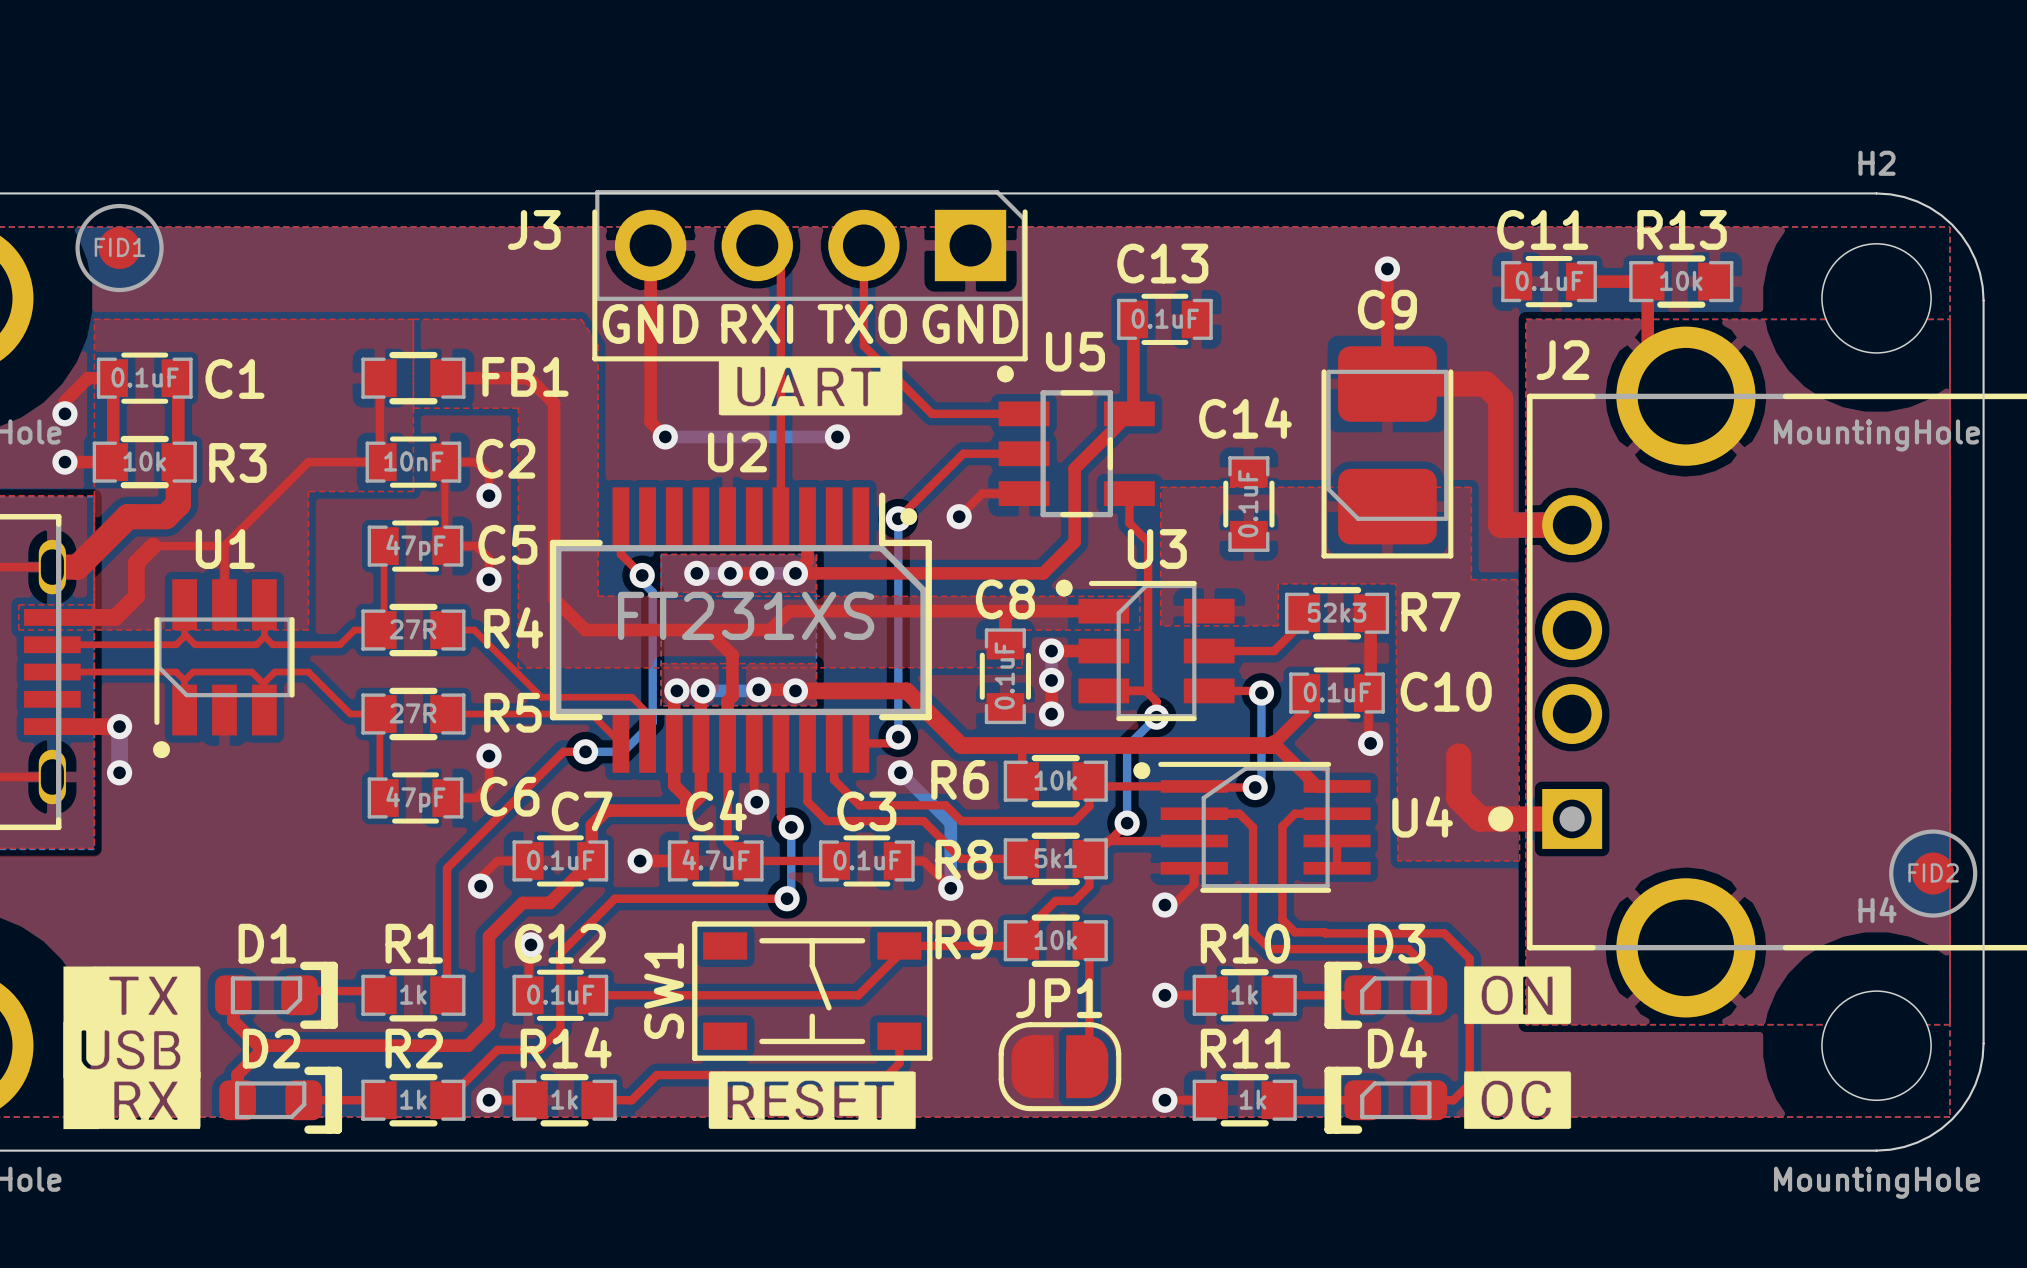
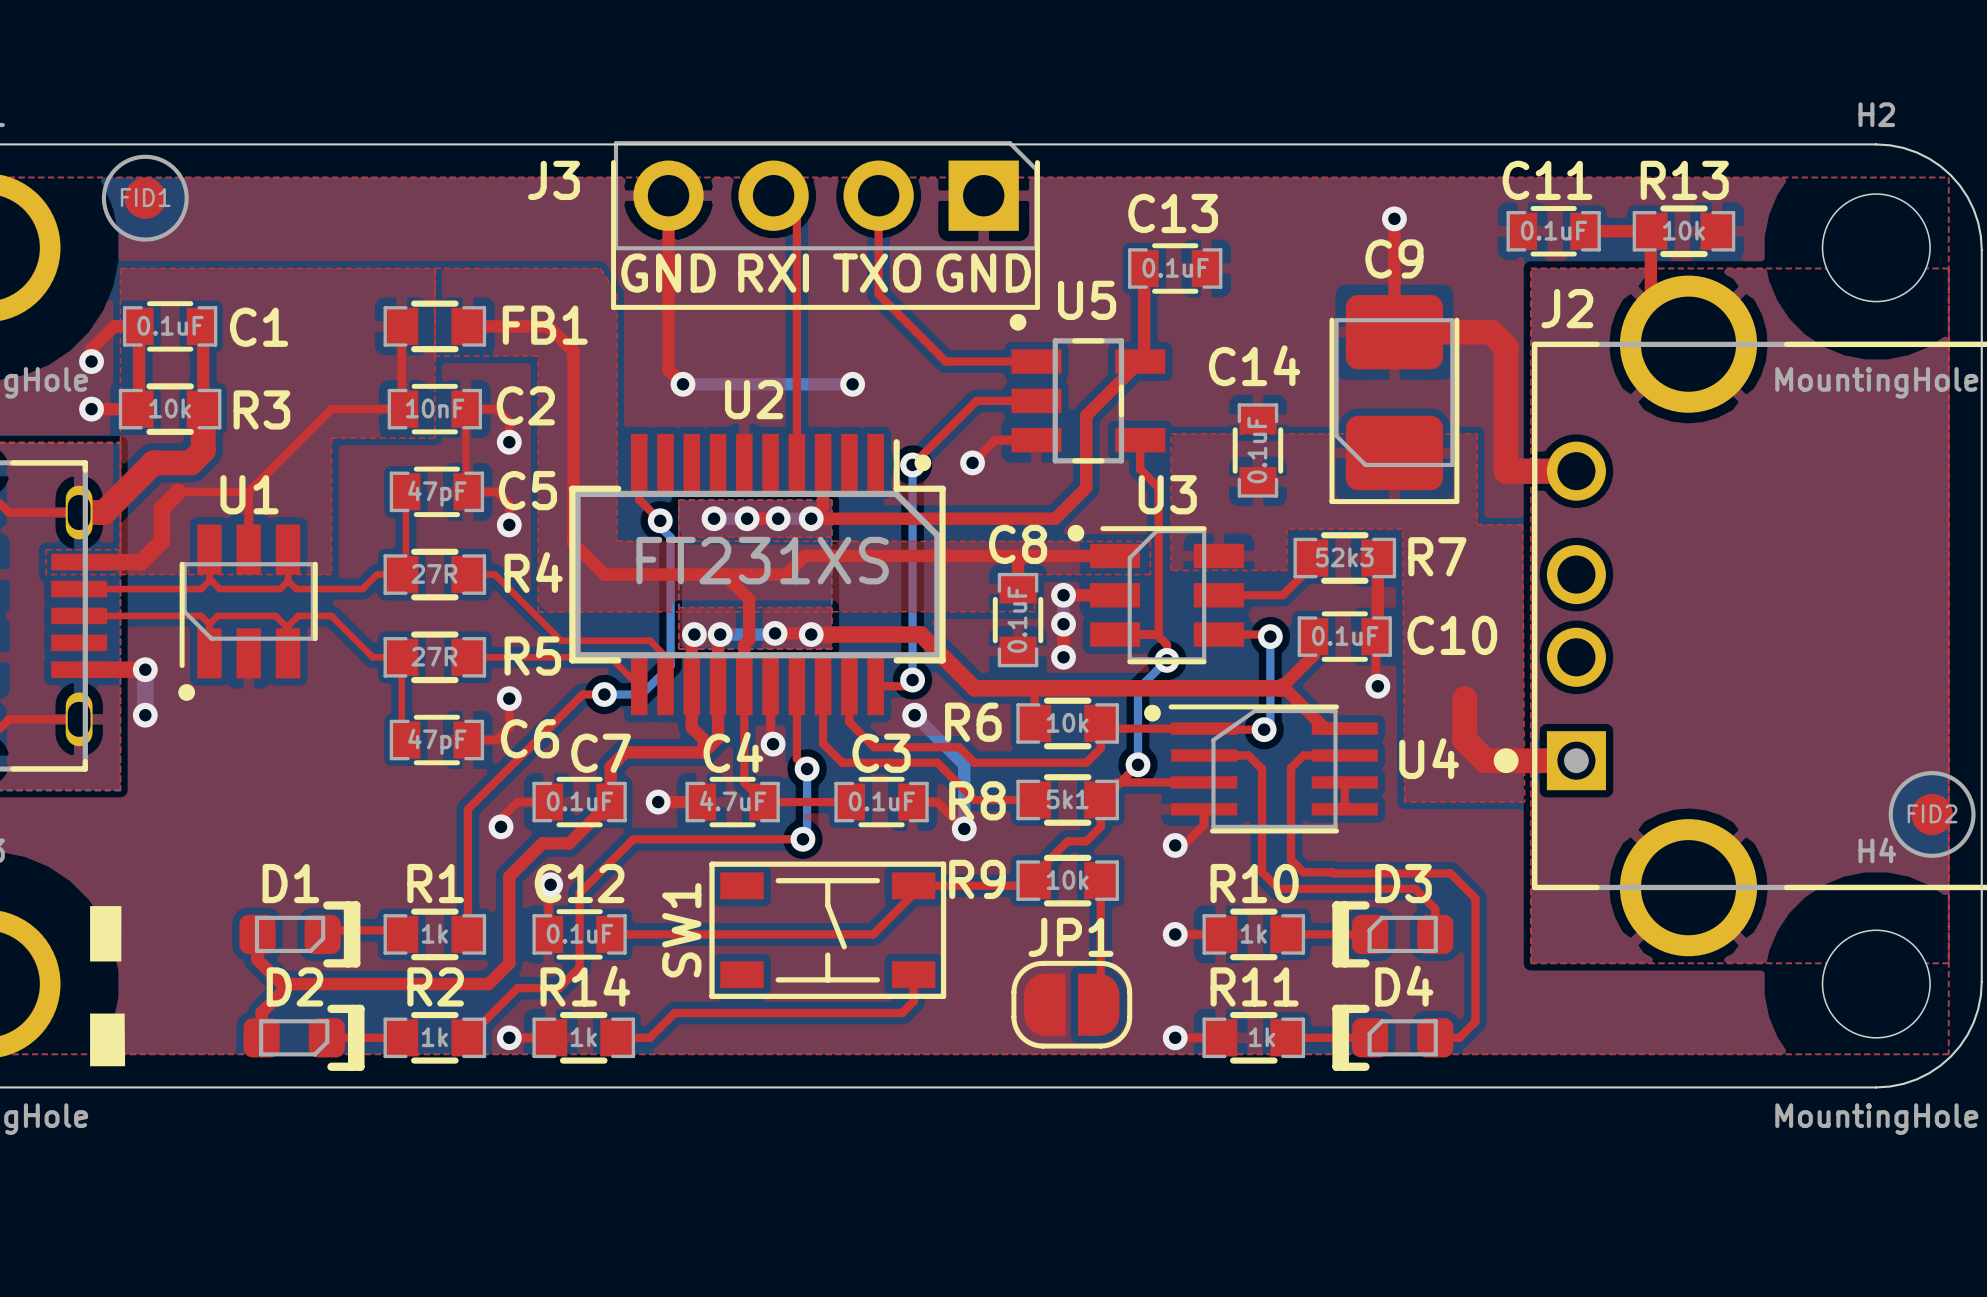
drawing: [718, 357, 903, 416] -> none
drawing: [63, 966, 201, 1130] -> none
drawing: [1464, 966, 1572, 1130] -> none
drawing: [708, 1071, 916, 1130] -> none

